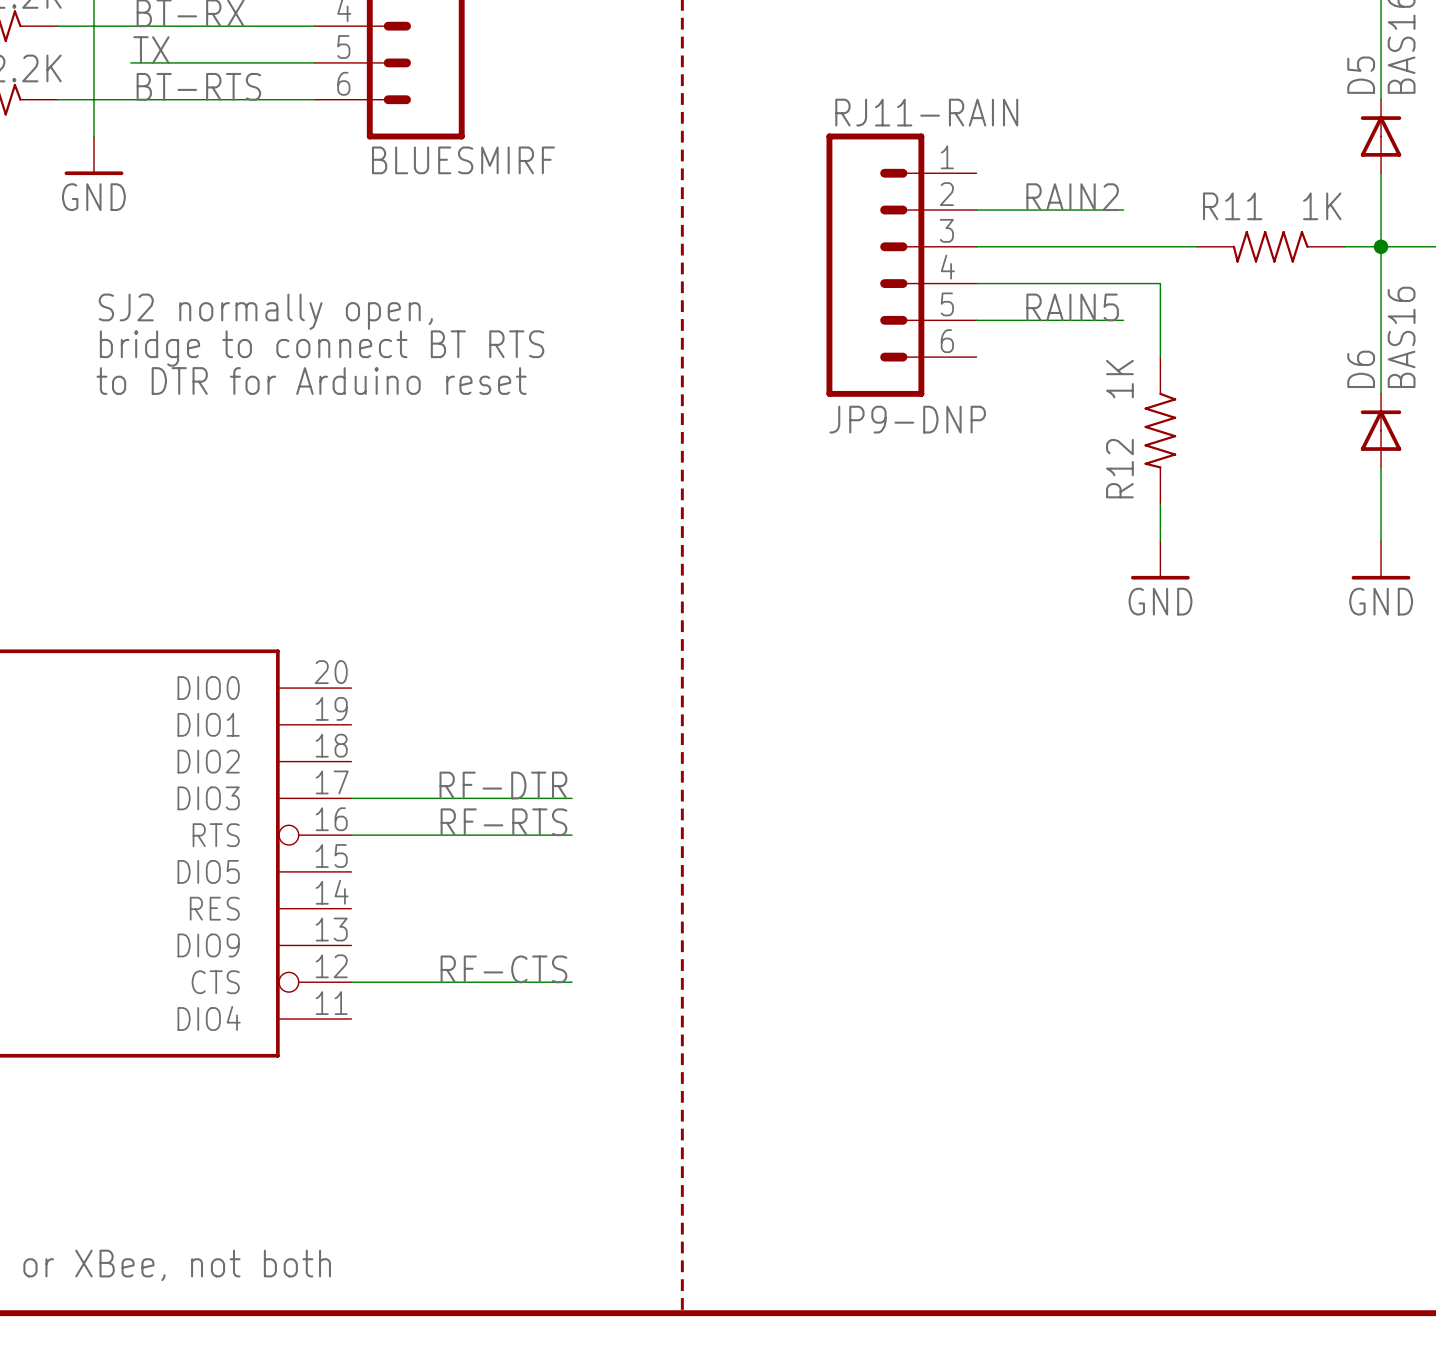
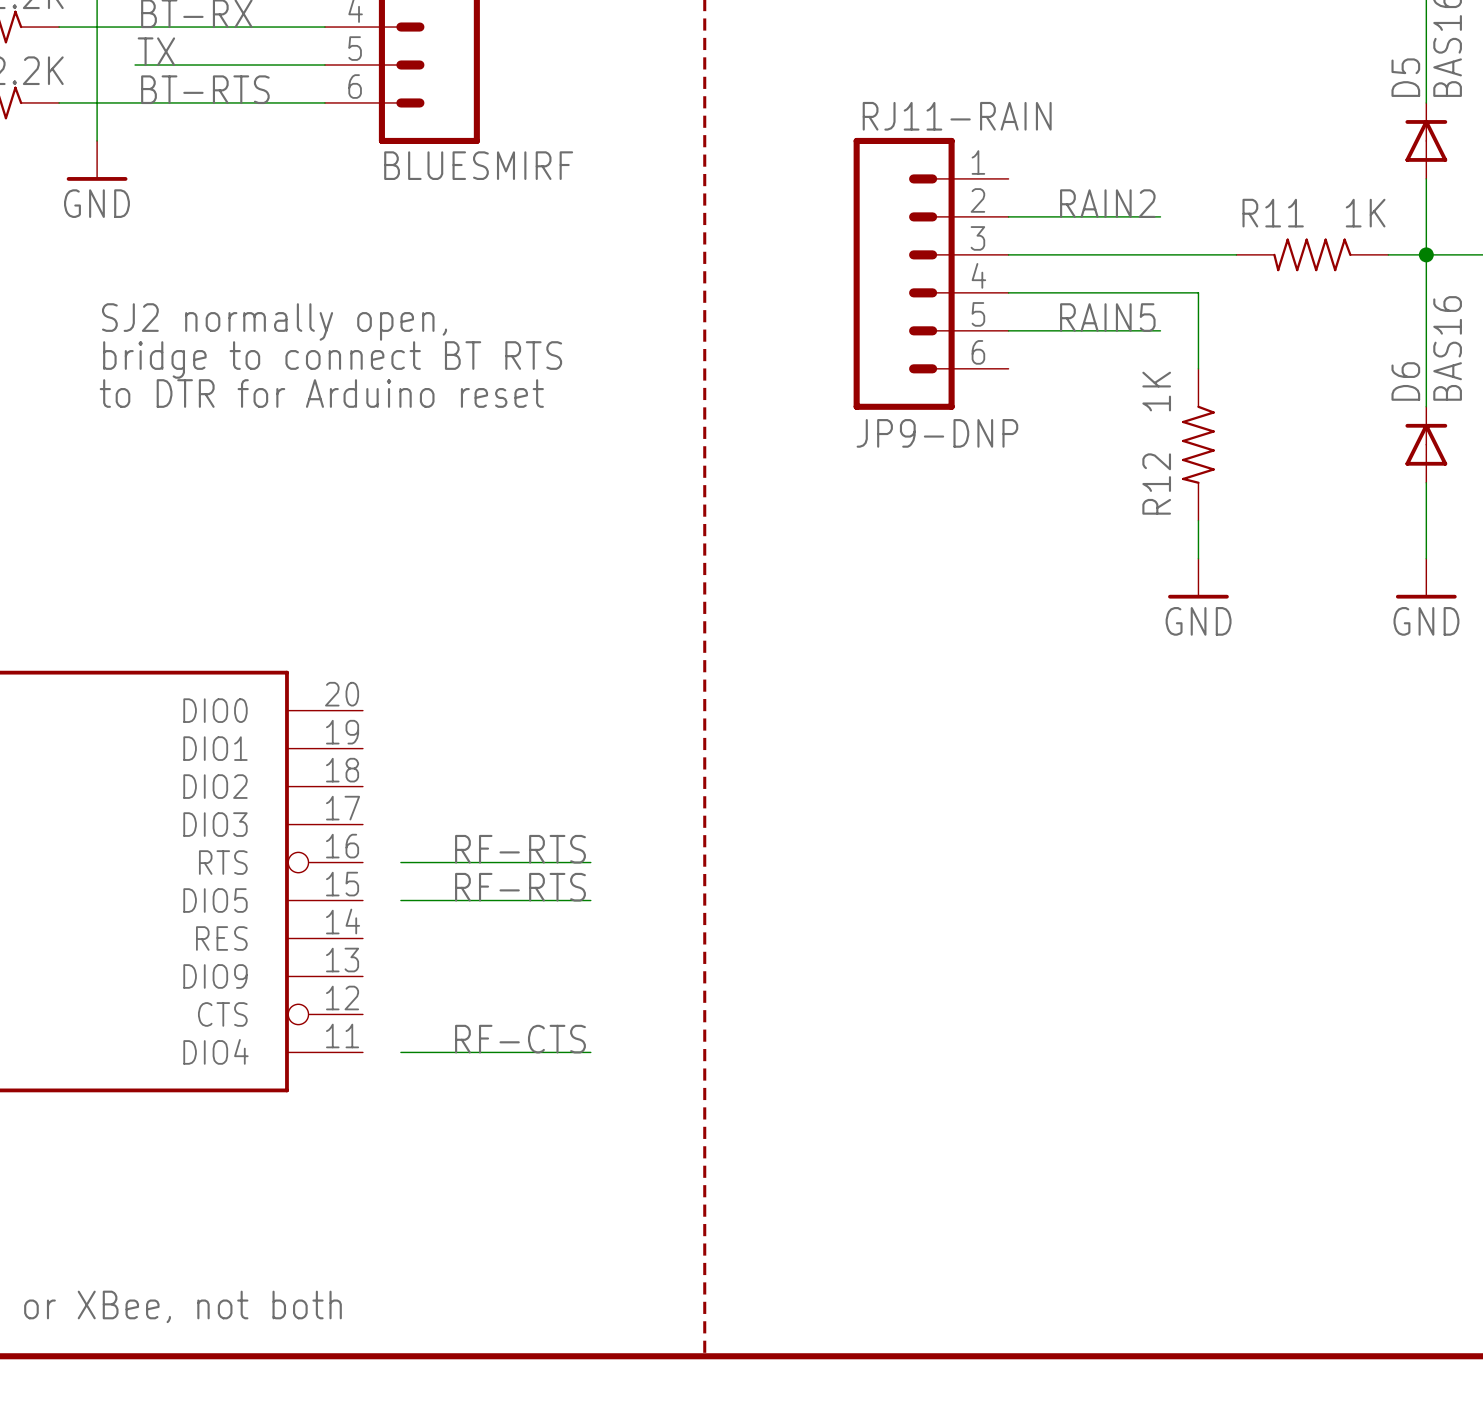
label: RF-DTR (503, 785) -> none
wire: (351, 798) (572, 798) -> none
wire: (351, 835) (388, 835) -> none
label: none -> RF-RTS (520, 887)
wire: none -> (400, 900) (590, 900)
label position: RF-CTS (503, 969) -> RF-CTS (520, 1039)
wire: (351, 982) (572, 982) -> none
wire: none -> (400, 1052) (590, 1052)

